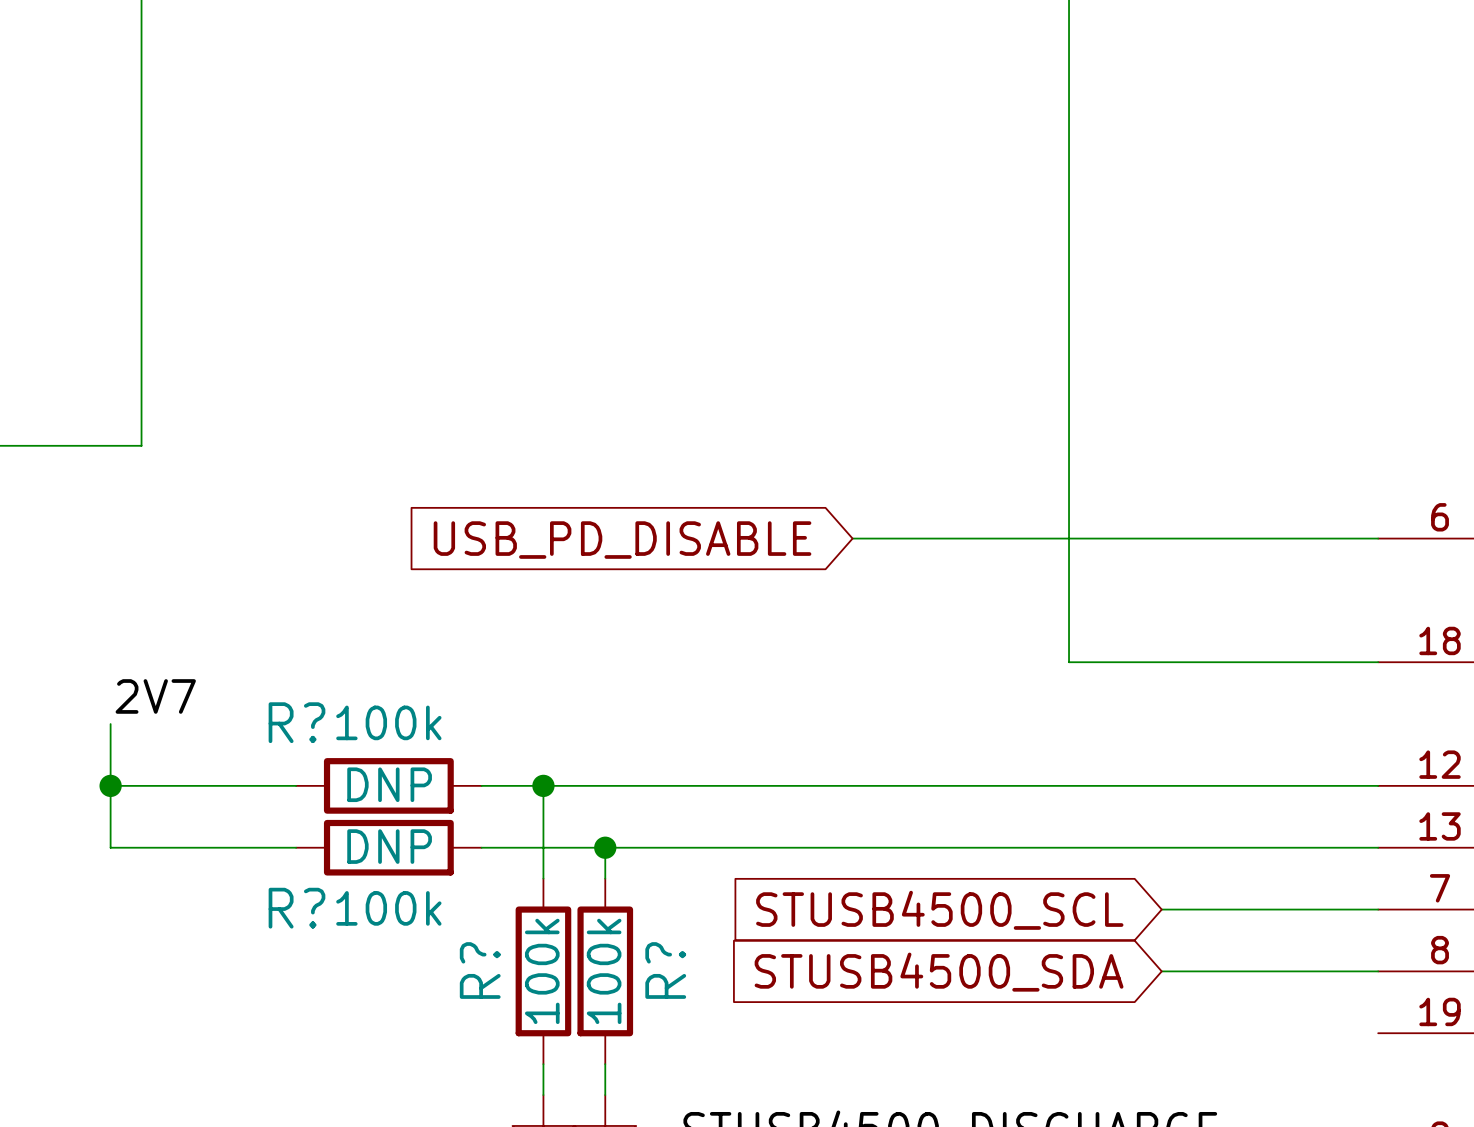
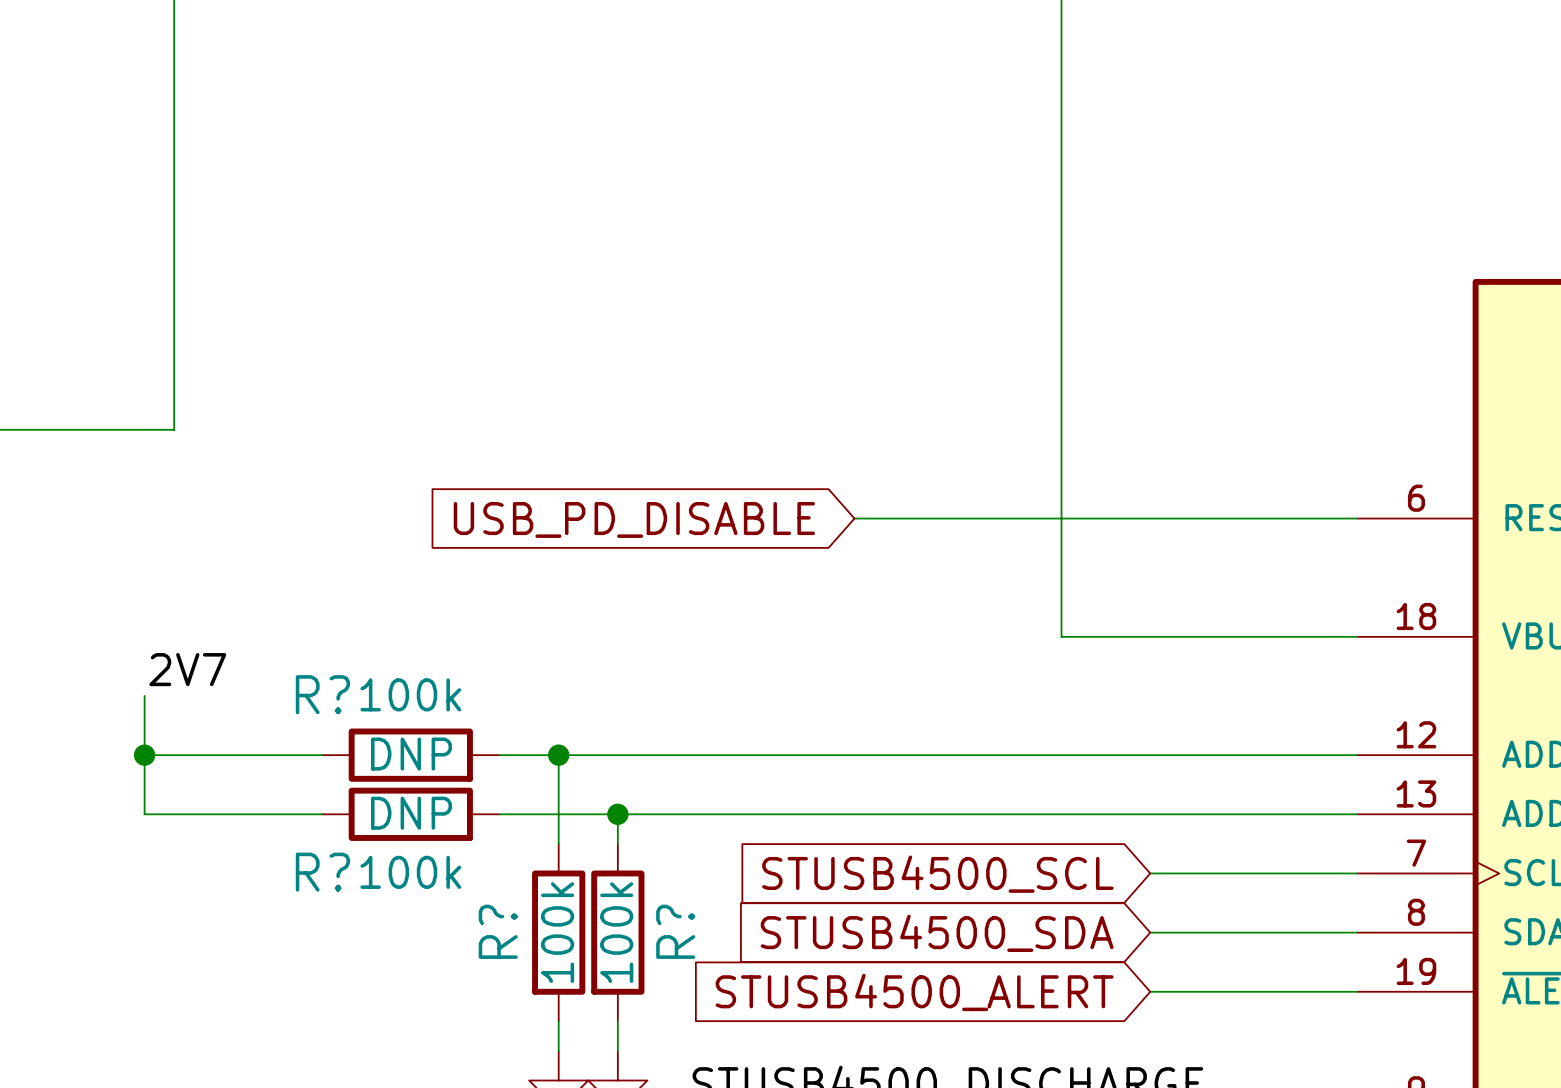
global label: none -> STUSB4500_ALERT (914, 992)
wire: none -> (1150, 991) (1357, 991)

